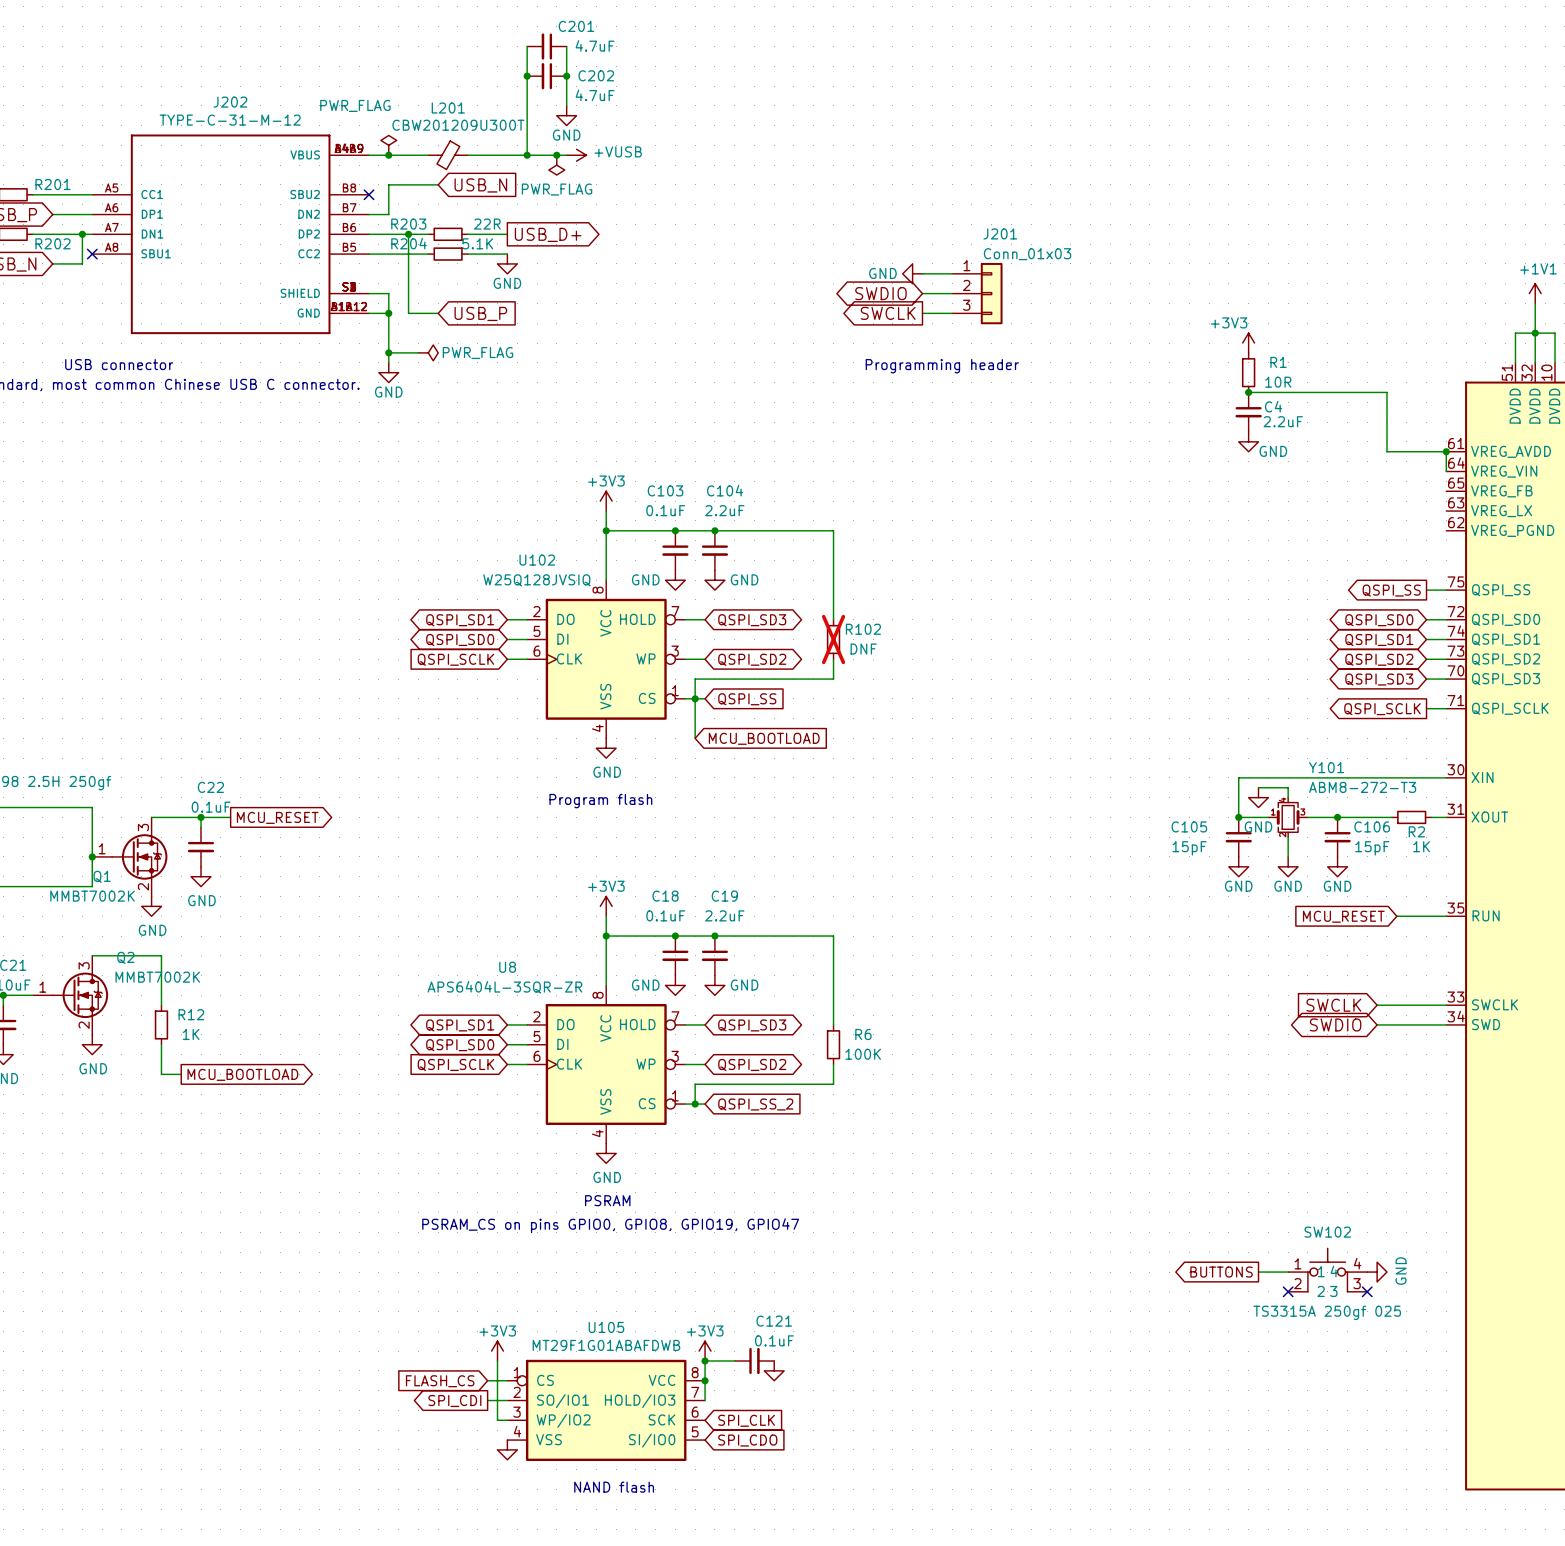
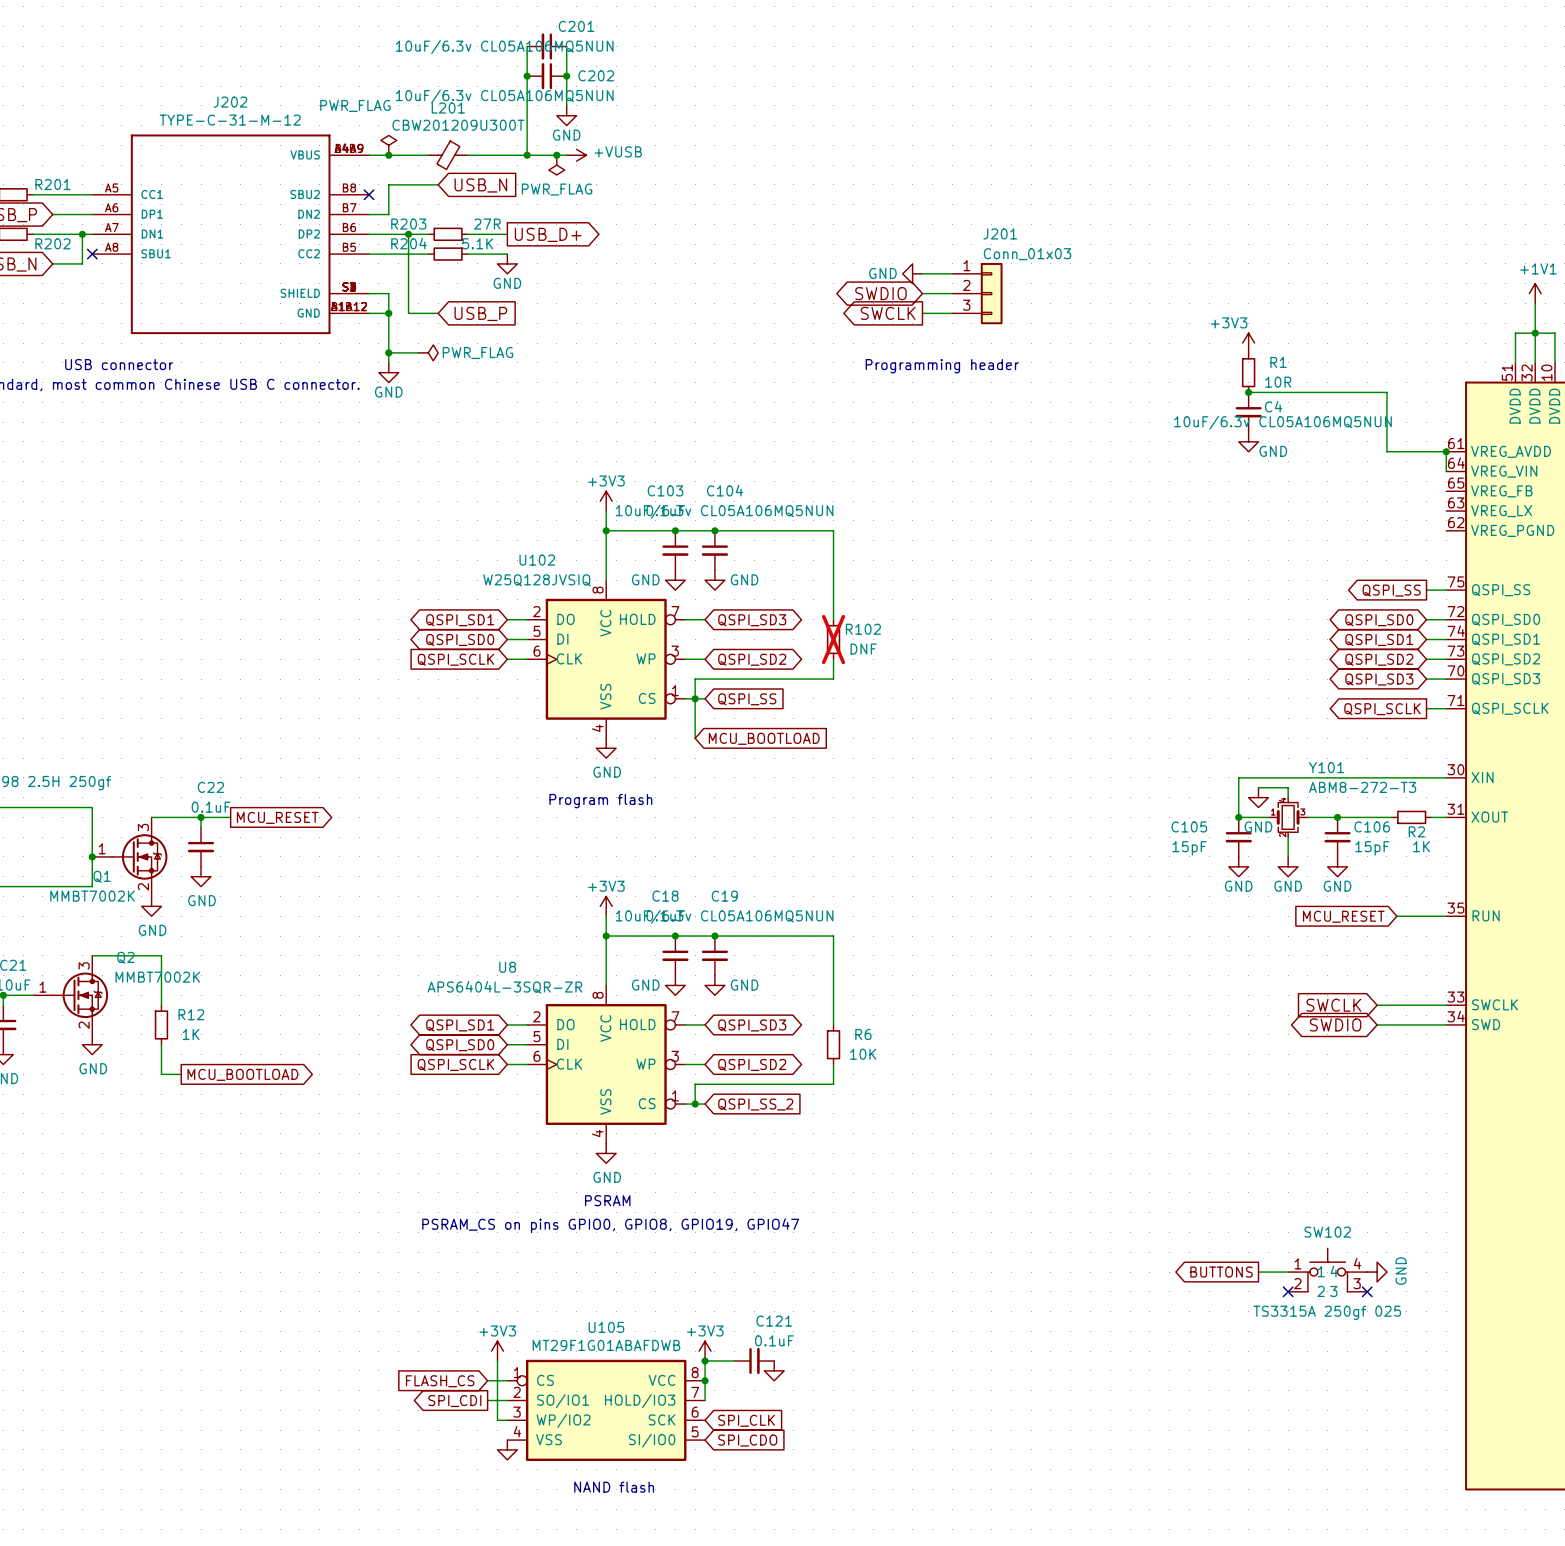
C201 value: 4.7uF (595, 45) -> 10uF/6.3v CL05A106MQ5NUN (504, 47)
C202 value: 4.7uF (595, 95) -> 10uF/6.3v CL05A106MQ5NUN (504, 96)
R203 value: 22R (487, 224) -> 27R (487, 224)
C4 value: 2.2uF (1283, 421) -> 10uF/6.3v CL05A106MQ5NUN (1282, 422)
C104 value: 2.2uF (724, 510) -> 10uF/6.3v CL05A106MQ5NUN (724, 511)
C19 value: 2.2uF (724, 915) -> 10uF/6.3v CL05A106MQ5NUN (724, 916)
R6 value: 100K (863, 1054) -> 10K (863, 1054)

